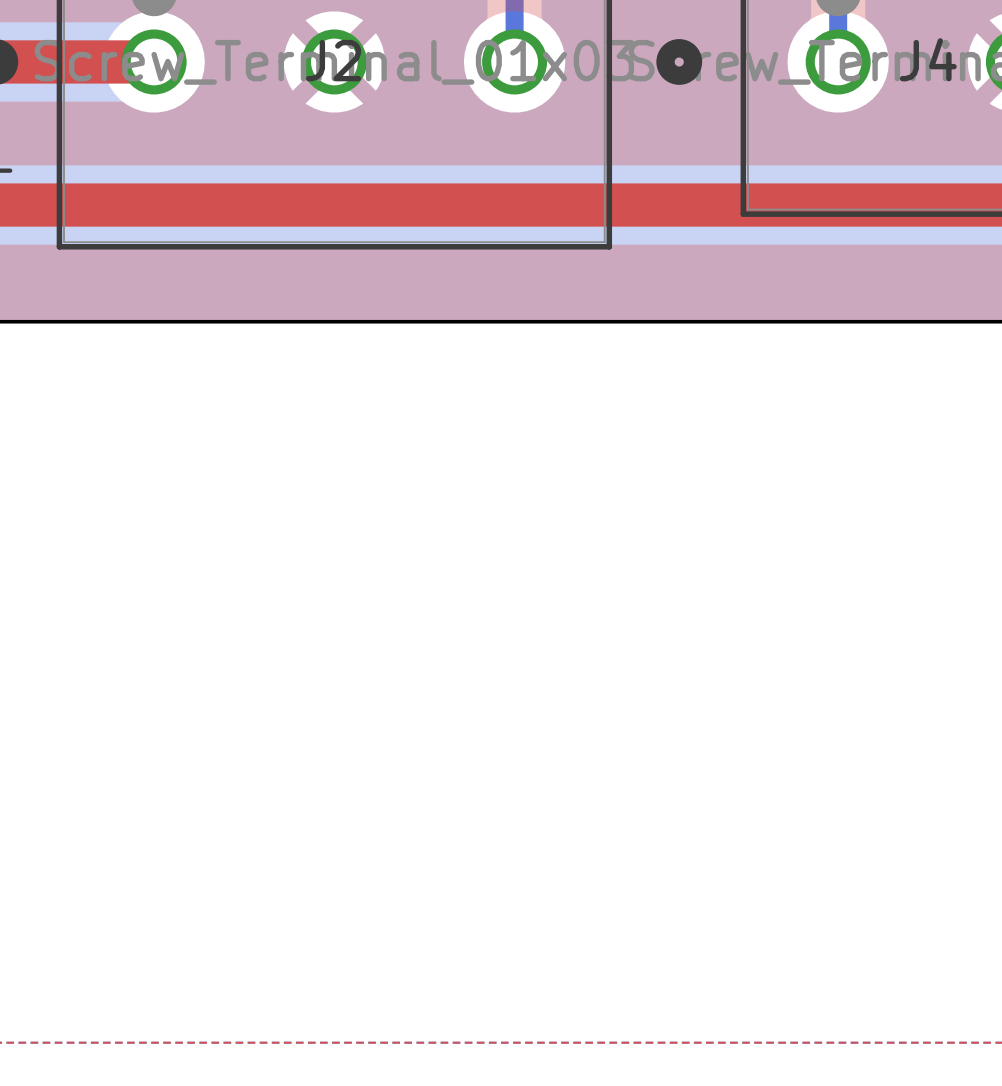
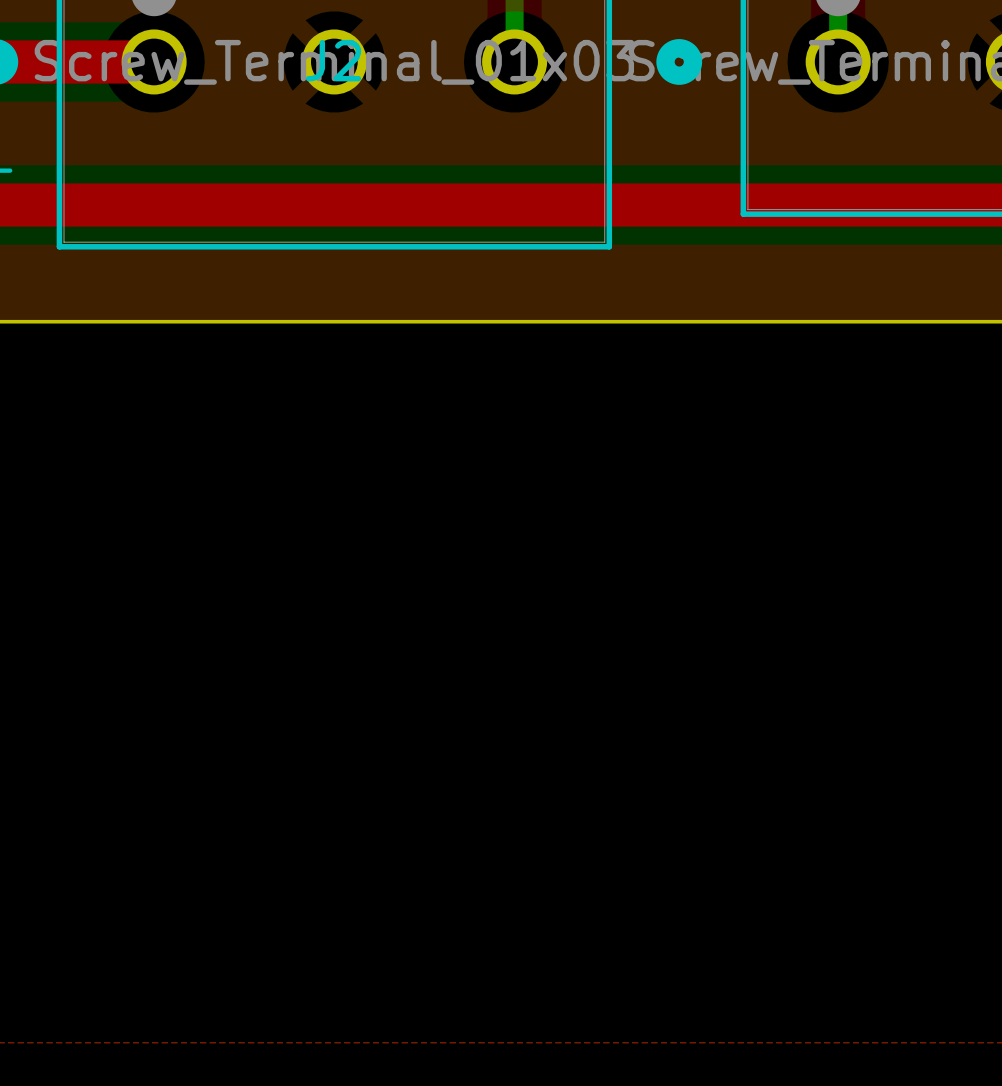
J4 name: J4 (928, 59) -> none

